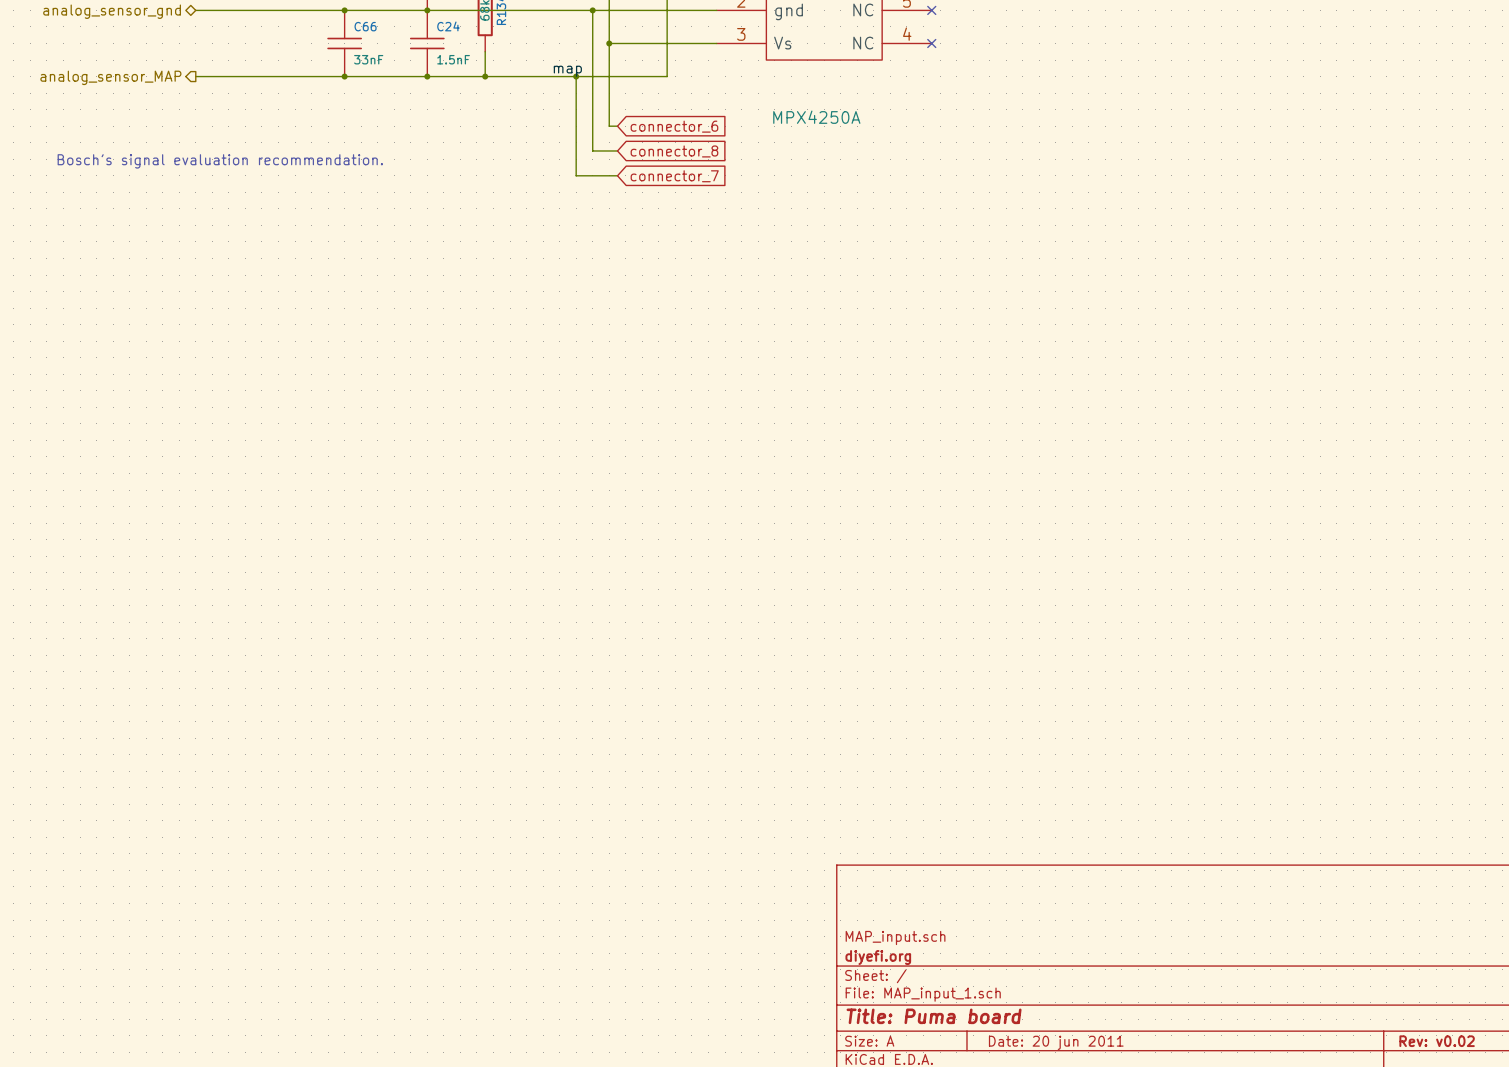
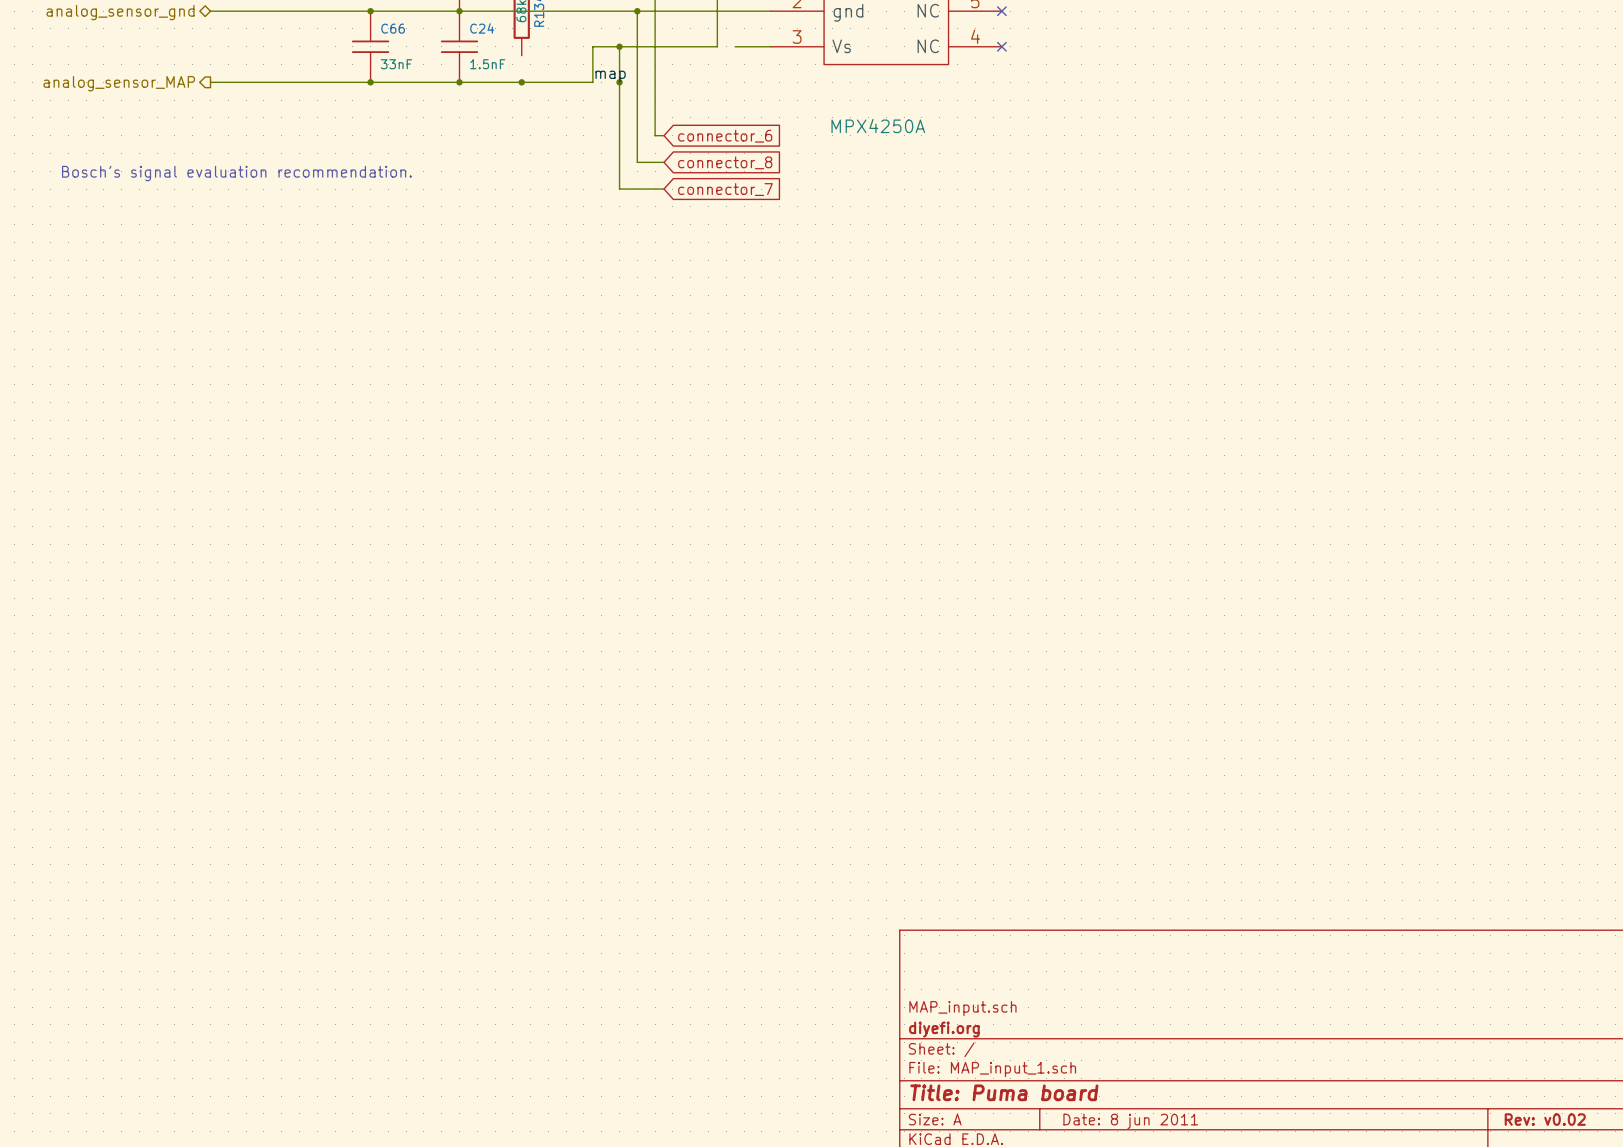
wire: none -> (619, 46) (619, 82)
junction: none -> (619, 46)
junction: (609, 43) -> none
wire: (683, 43) (667, 43) (667, 76) (551, 76) -> (655, 46) (592, 46) (592, 82)
wire: (485, 51) (485, 76) -> none
title block: Date: 20 jun 2011 (1056, 1042) -> Date: 8 jun 2011 (1130, 1121)

